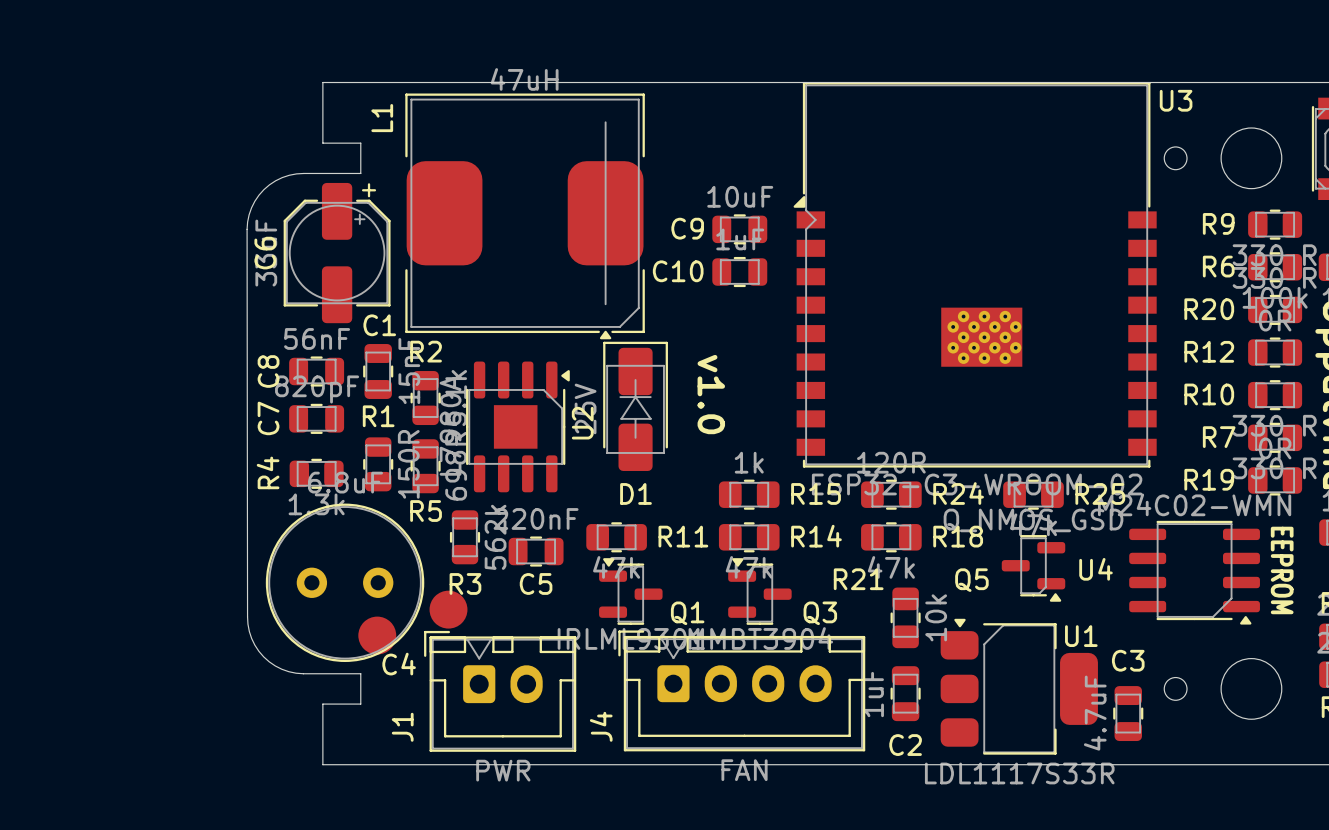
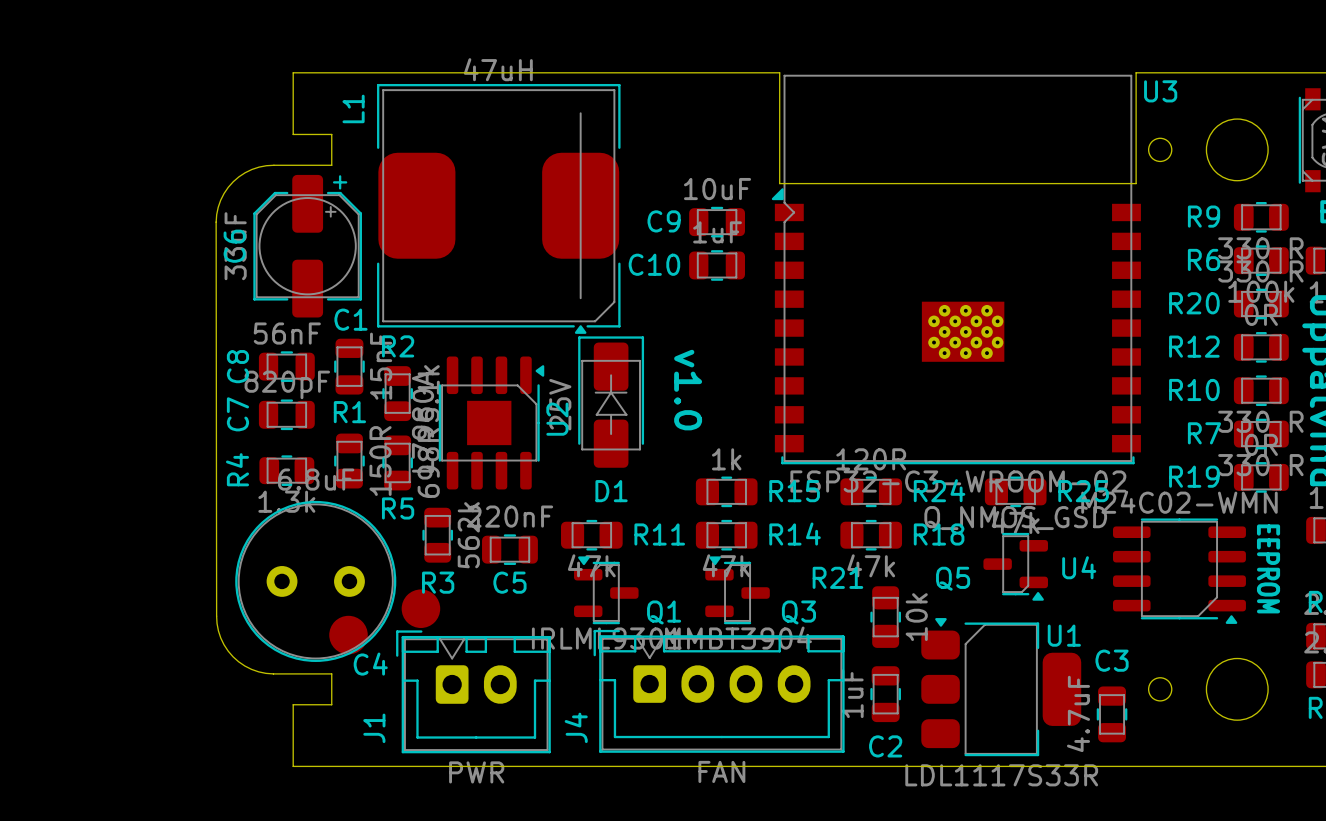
U3 footprint: [793, 82, 1157, 468] -> [771, 74, 1141, 465]
board edge: (801, 82) (1151, 82) -> (779, 72) (779, 183) (1136, 183) (1136, 72)

